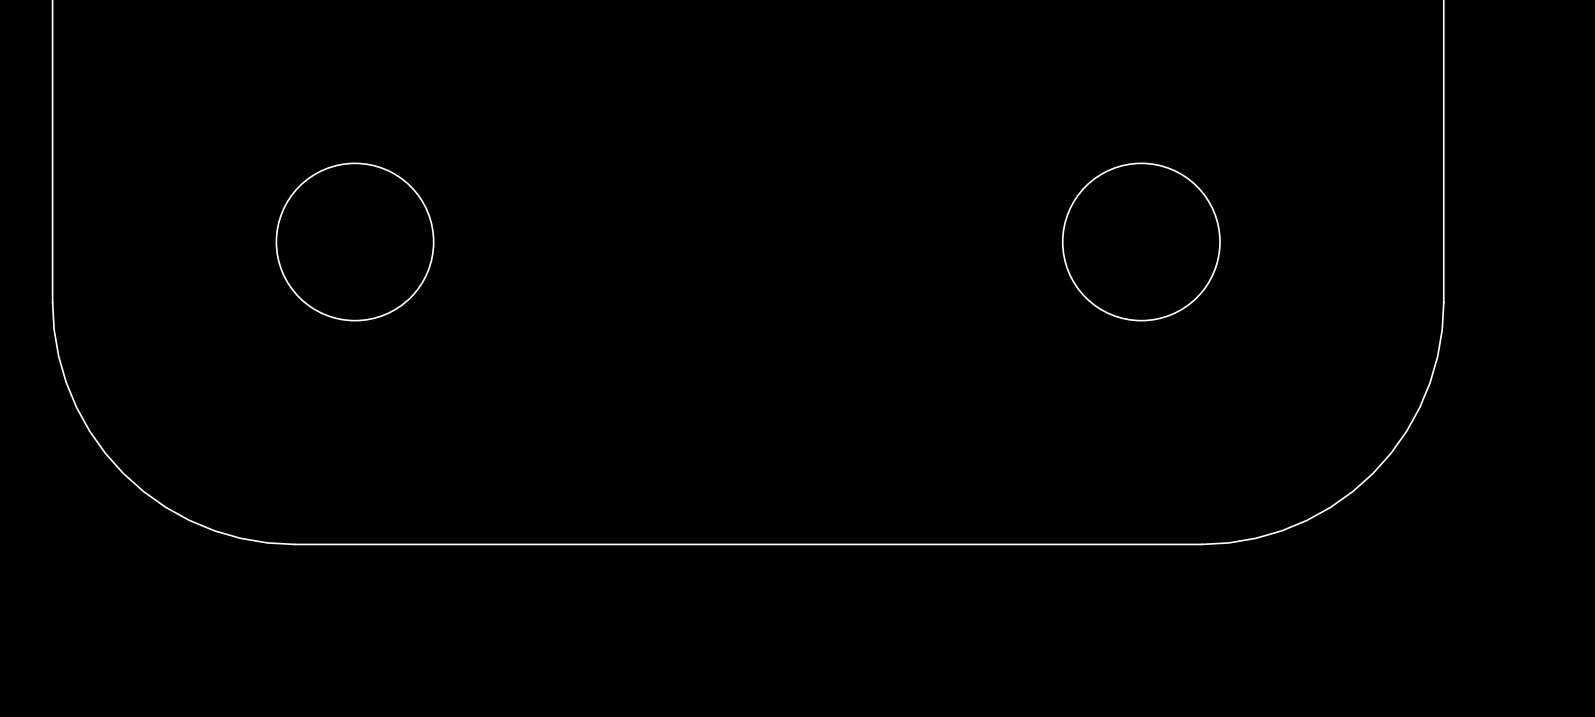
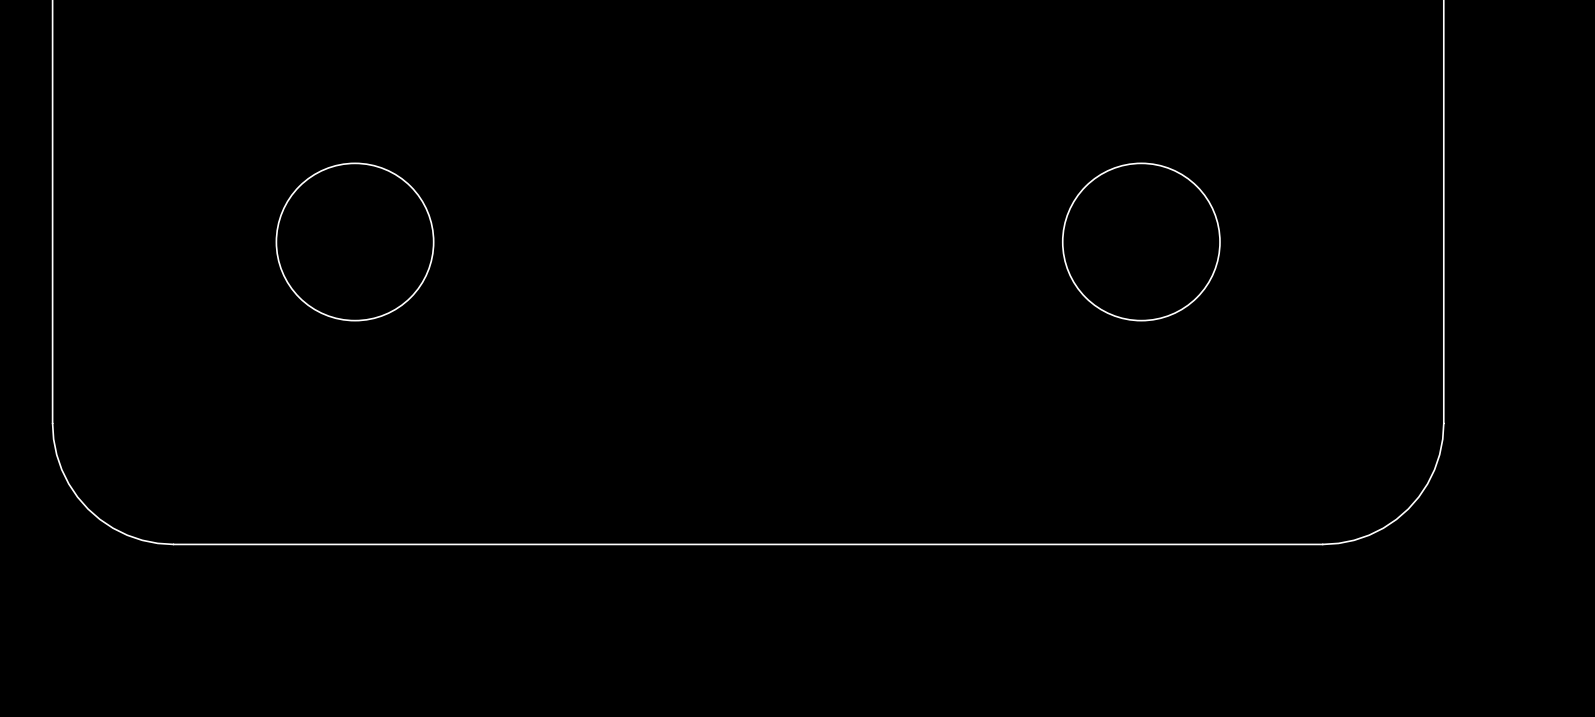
board edge: (52, 302) (54, 329) (58, 356) (66, 382) (76, 407) (89, 431) (105, 453) (123, 473) (143, 491) (165, 507) (189, 520) (214, 530) (240, 538) (267, 542) (294, 544) -> (52, 302) (53, 439) (61, 469) (77, 497) (88, 509) (99, 519) (127, 535) (157, 543) (294, 544)
board edge: (1443, 302) (1442, 329) (1437, 356) (1430, 382) (1419, 407) (1406, 431) (1391, 453) (1372, 473) (1352, 491) (1330, 507) (1306, 520) (1281, 530) (1255, 538) (1228, 542) (1201, 544) -> (1443, 302) (1442, 439) (1434, 469) (1418, 497) (1408, 509) (1396, 519) (1369, 535) (1338, 543) (1201, 544)

